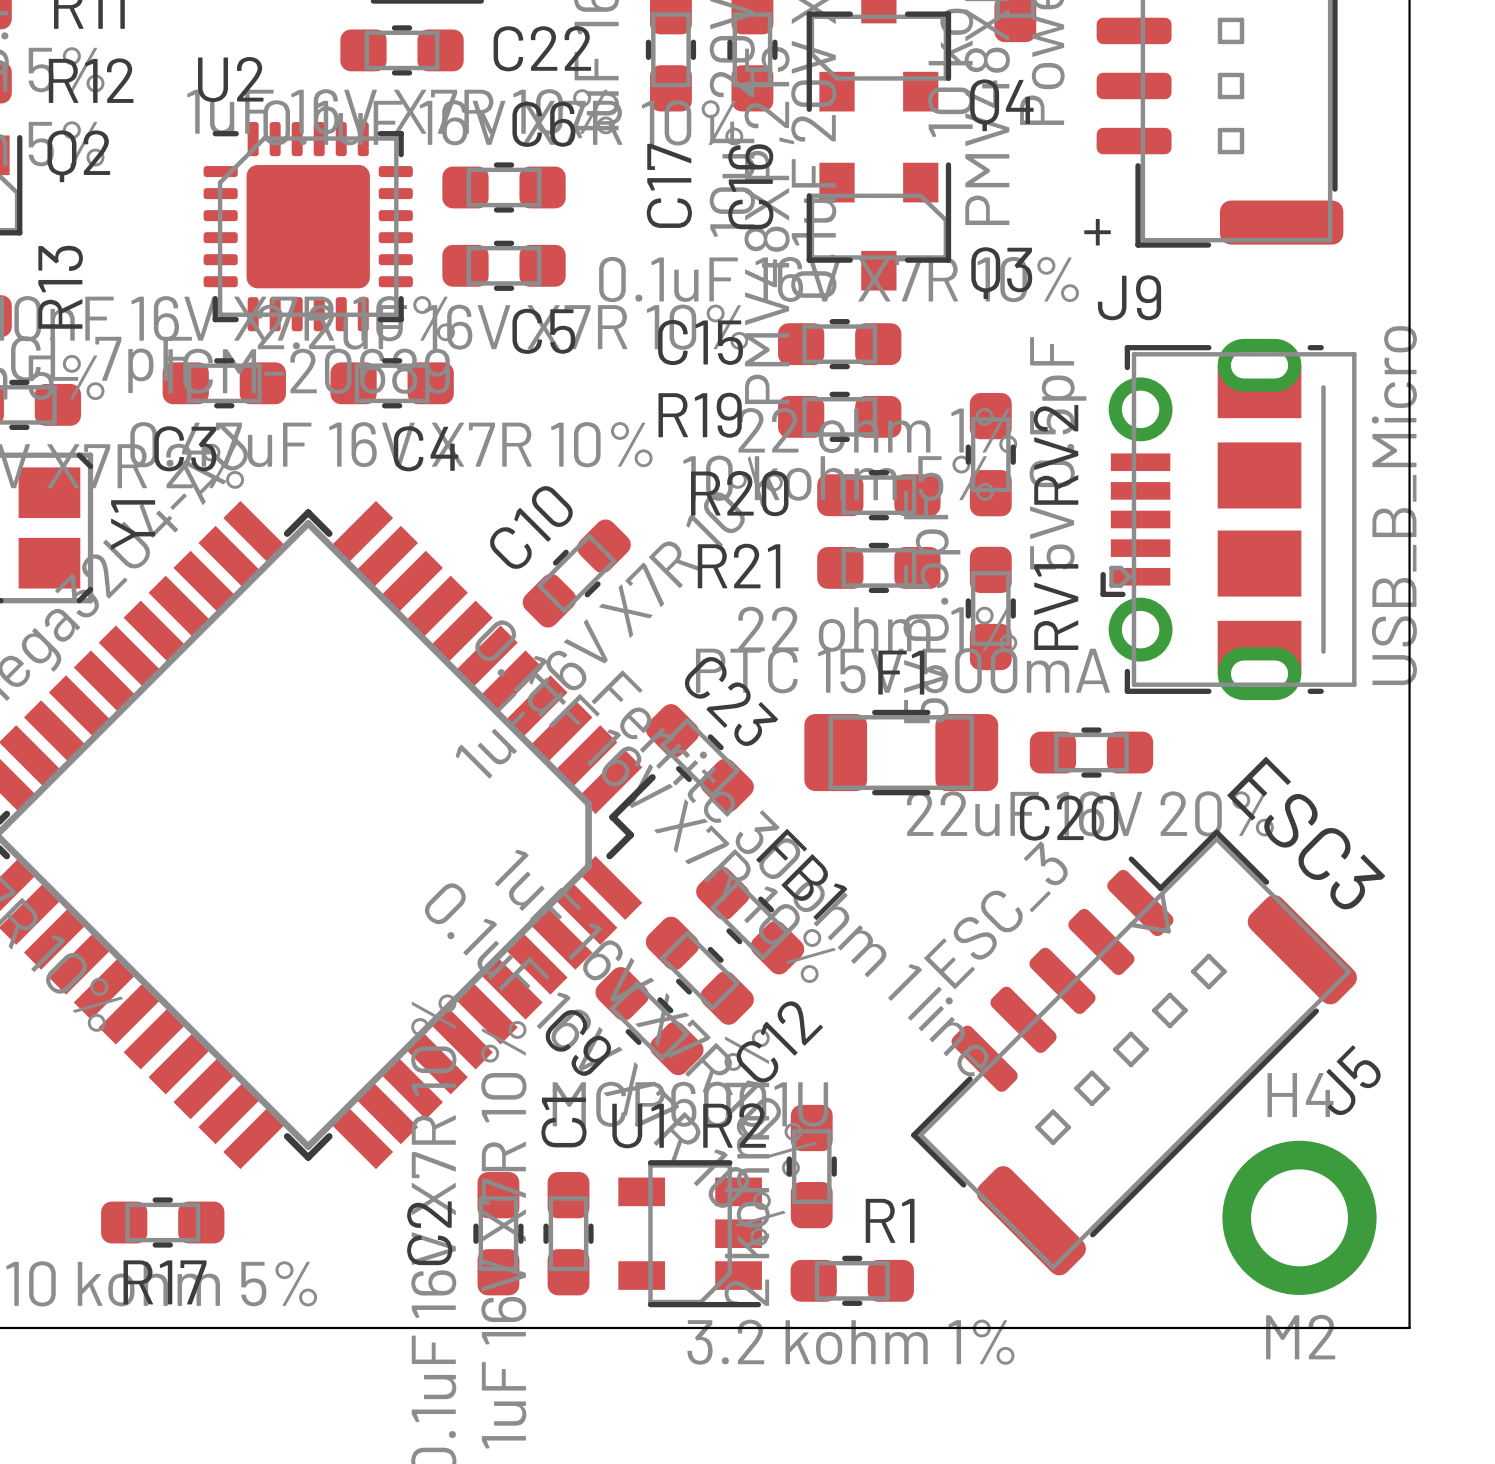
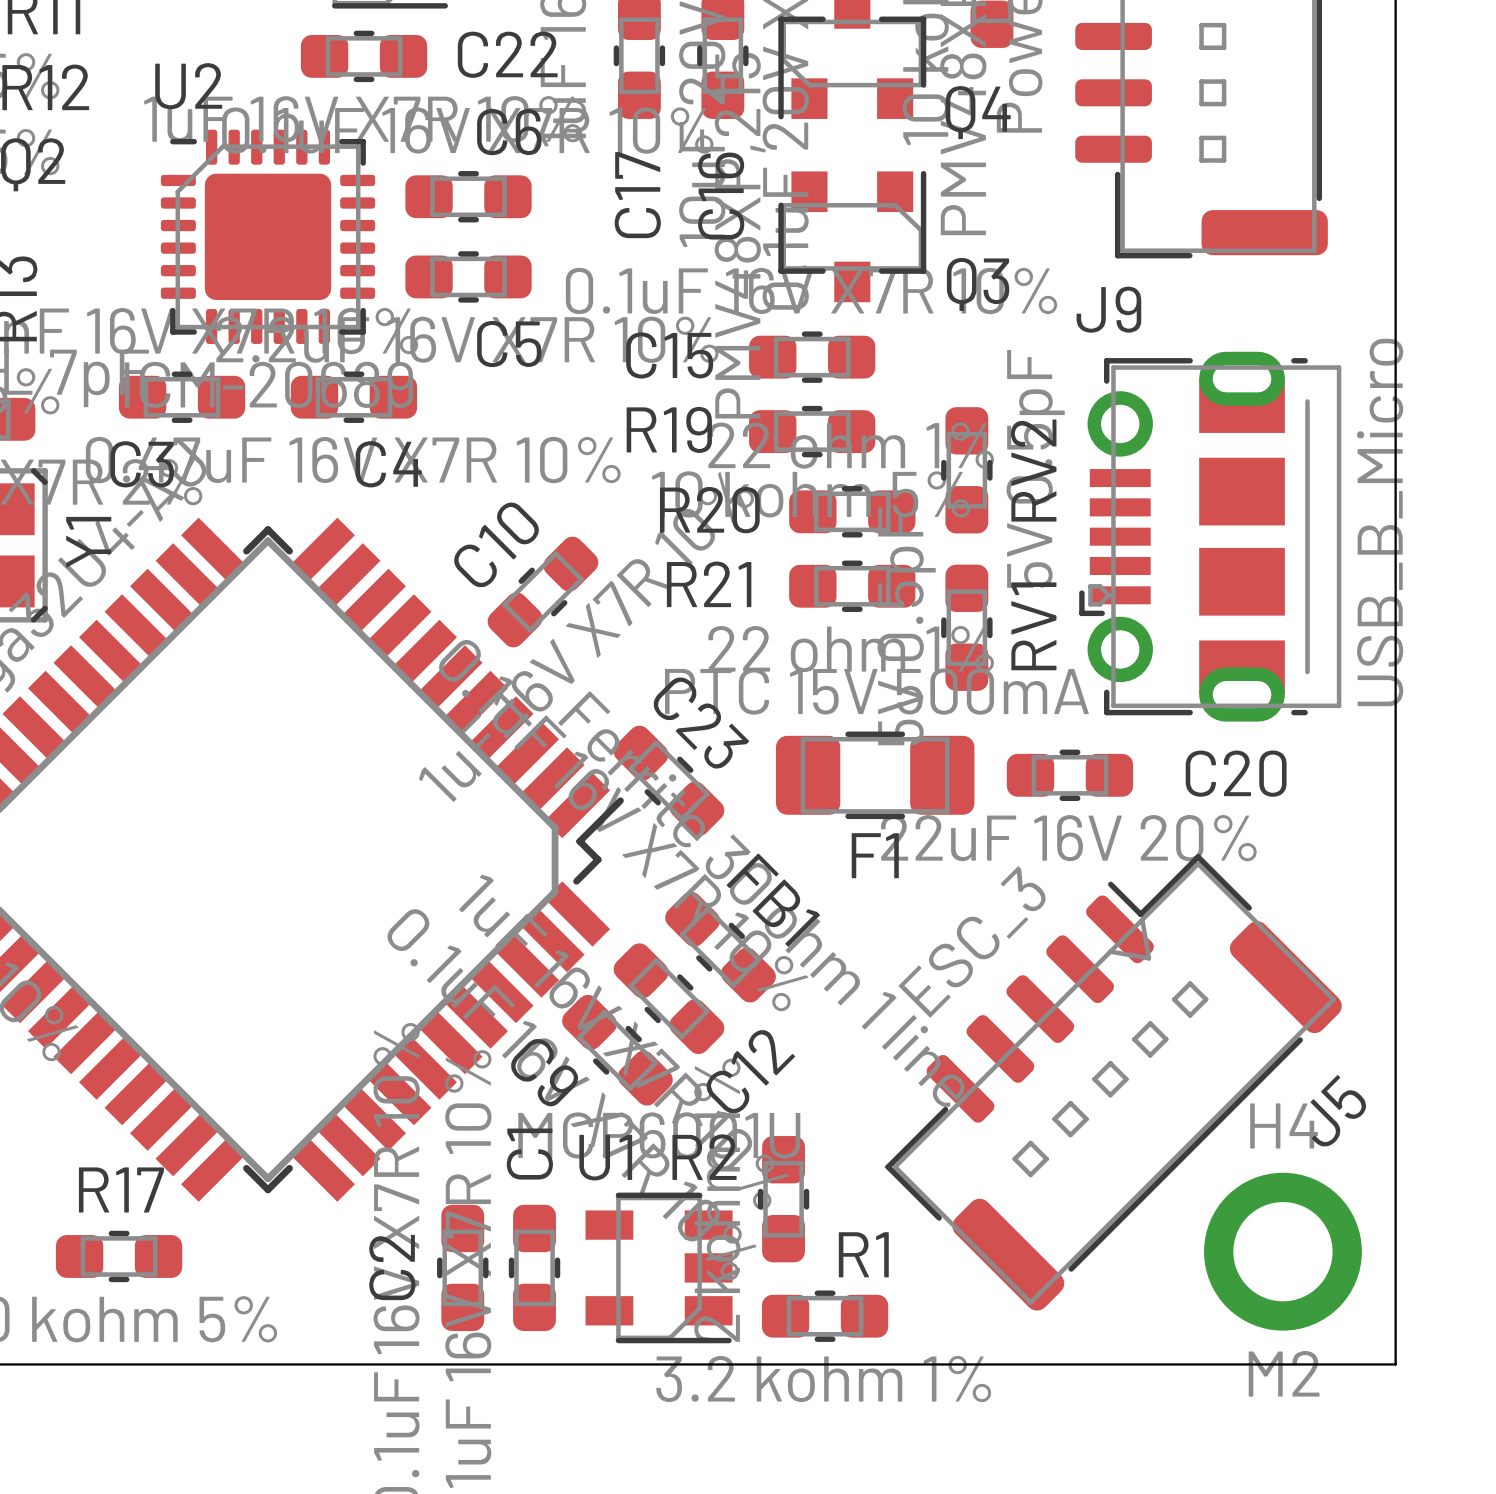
text: + (1097, 232) -> none
F1 name position: F1 (901, 672) -> F1 (875, 855)
C20 name position: C20 (1069, 818) -> C20 (1236, 773)
text: ESC3 (1306, 833) -> none
R17 name position: R17 (165, 1282) -> R17 (121, 1189)

